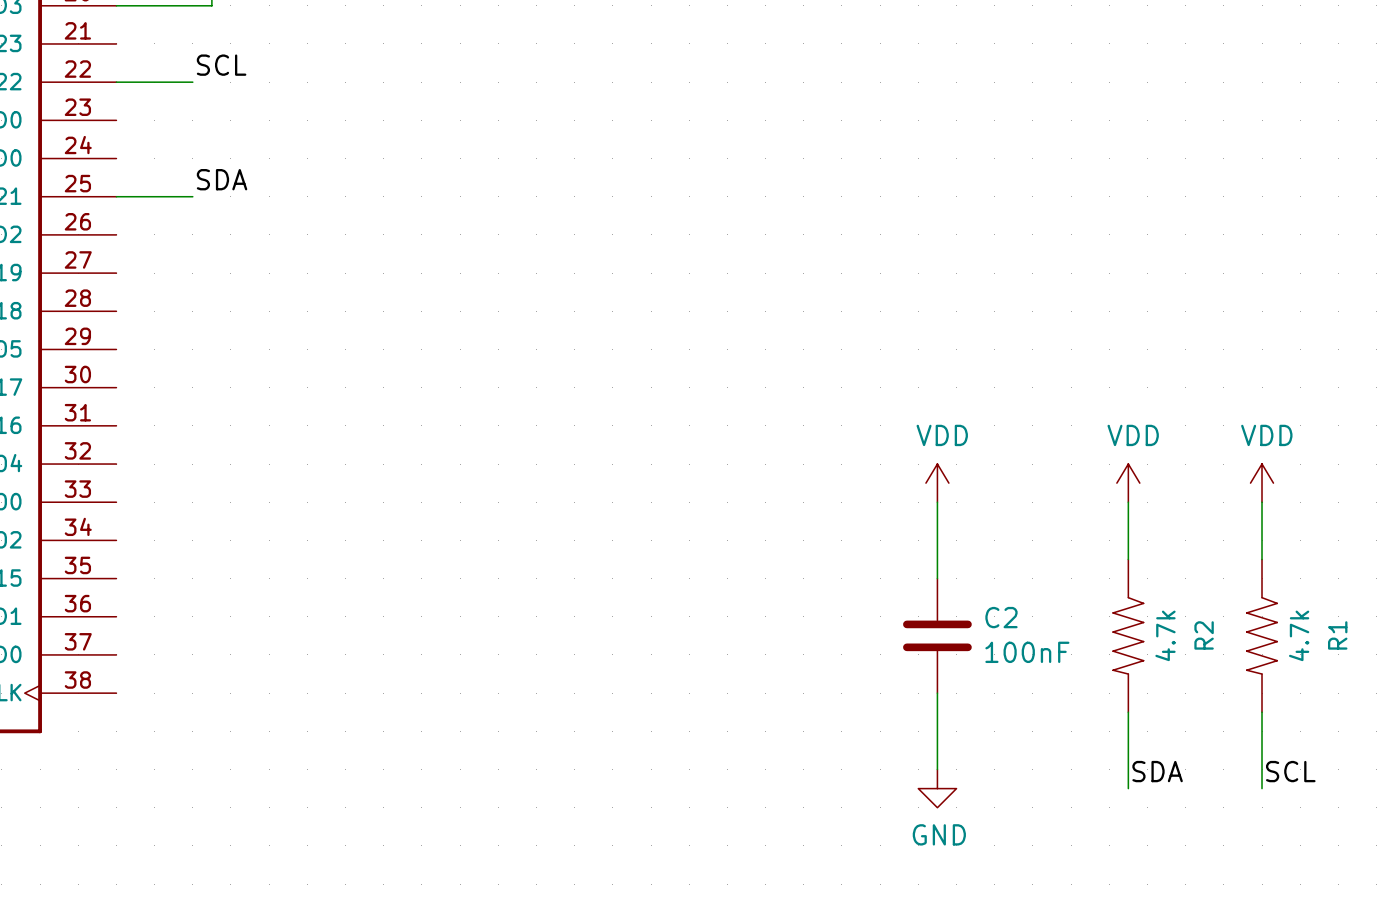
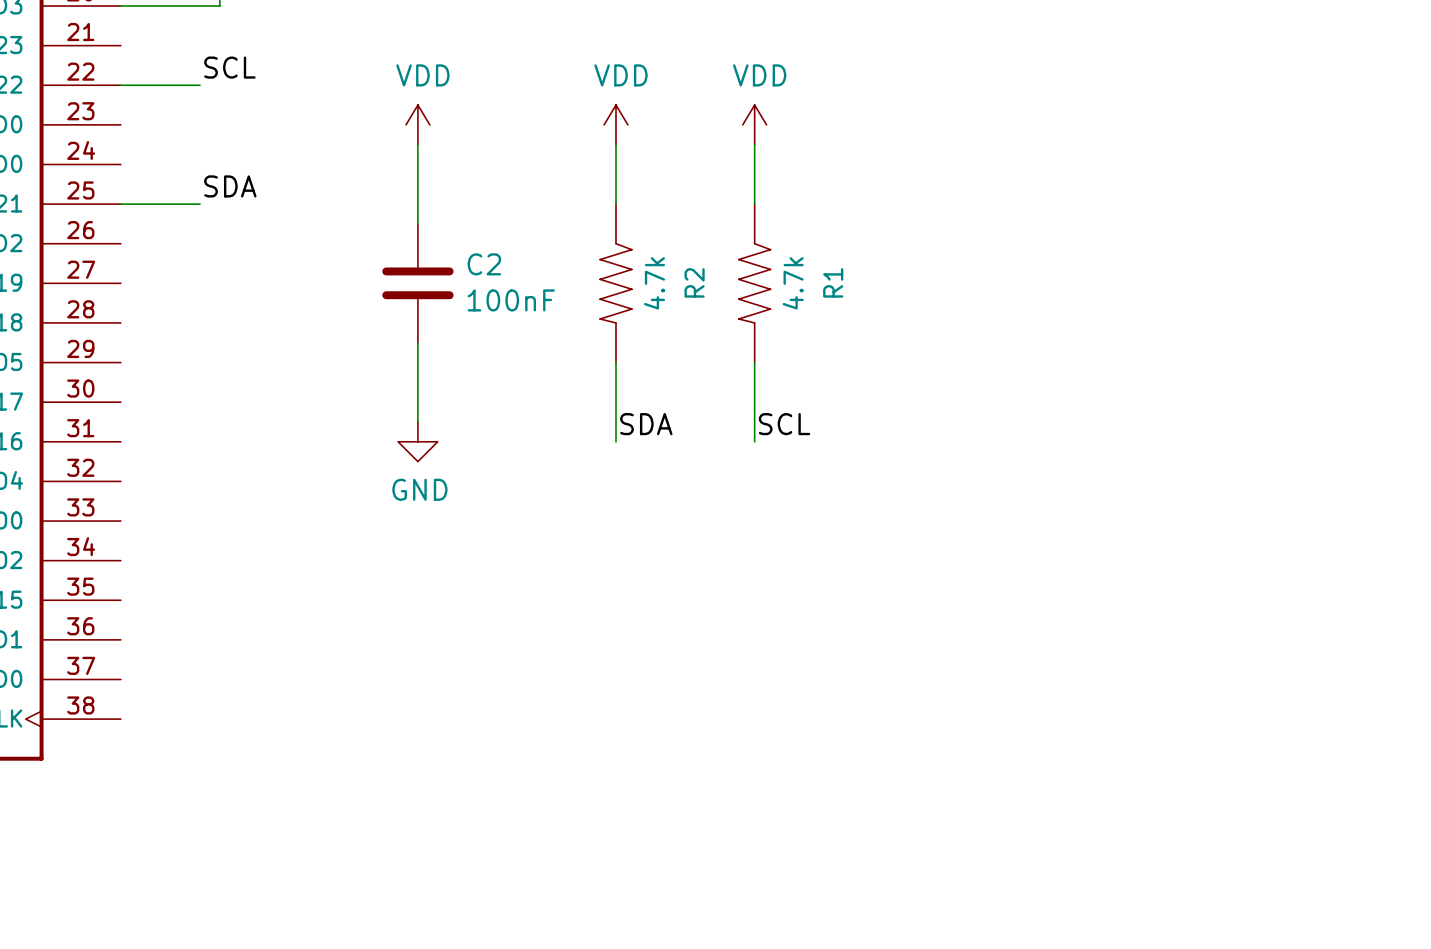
power symbol: none -> VDD (417, 124)
power symbol: none -> VDD (616, 124)
power symbol: none -> VDD (754, 124)
wire: none -> (417, 144) (417, 223)
wire: none -> (616, 144) (616, 204)
wire: none -> (754, 144) (754, 204)
wire: none -> (417, 342) (417, 421)
wire: none -> (616, 362) (616, 441)
label: none -> SDA (646, 424)
label: none -> SCL (784, 424)
power symbol: none -> GND (417, 441)
power symbol: VDD (937, 483) -> none
power symbol: VDD (1128, 483) -> none
power symbol: VDD (1262, 483) -> none
wire: (937, 502) (937, 578) -> (754, 362) (754, 441)
wire: (1128, 502) (1128, 559) -> none
wire: (1262, 502) (1262, 559) -> none
C2 position: (937, 635) -> (417, 283)
R2 position: (1128, 635) -> (616, 283)
R1 position: (1262, 635) -> (754, 283)
wire: (937, 693) (937, 769) -> none
wire: (1128, 712) (1128, 788) -> none
wire: (1262, 712) (1262, 788) -> none
label: SDA (1157, 771) -> none
label: SCL (1290, 771) -> none
power symbol: GND (937, 788) -> none

